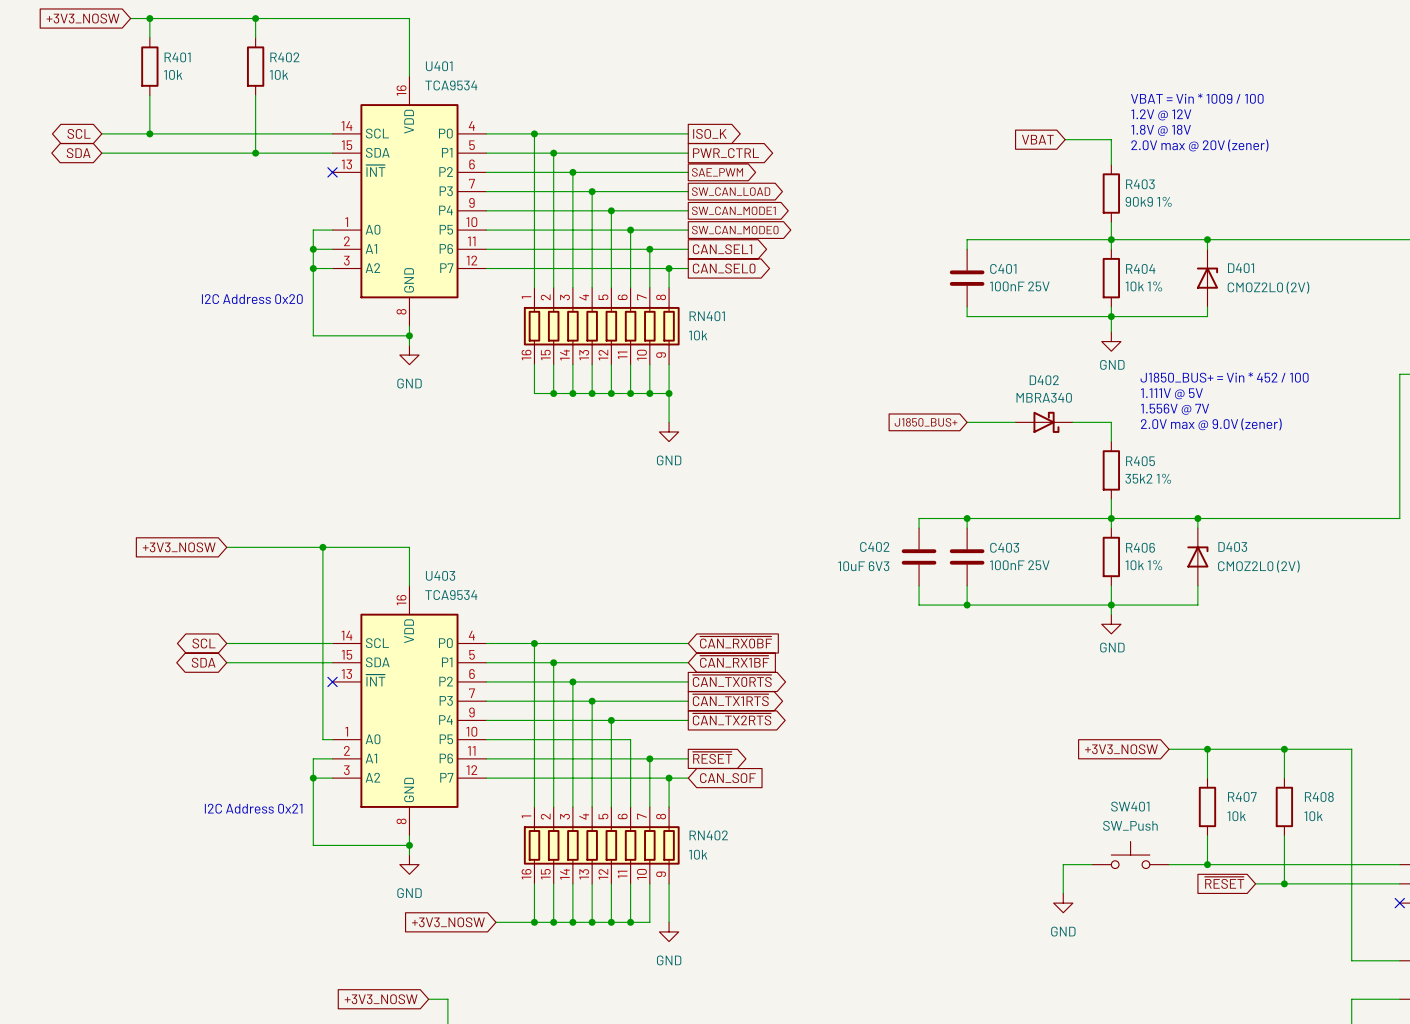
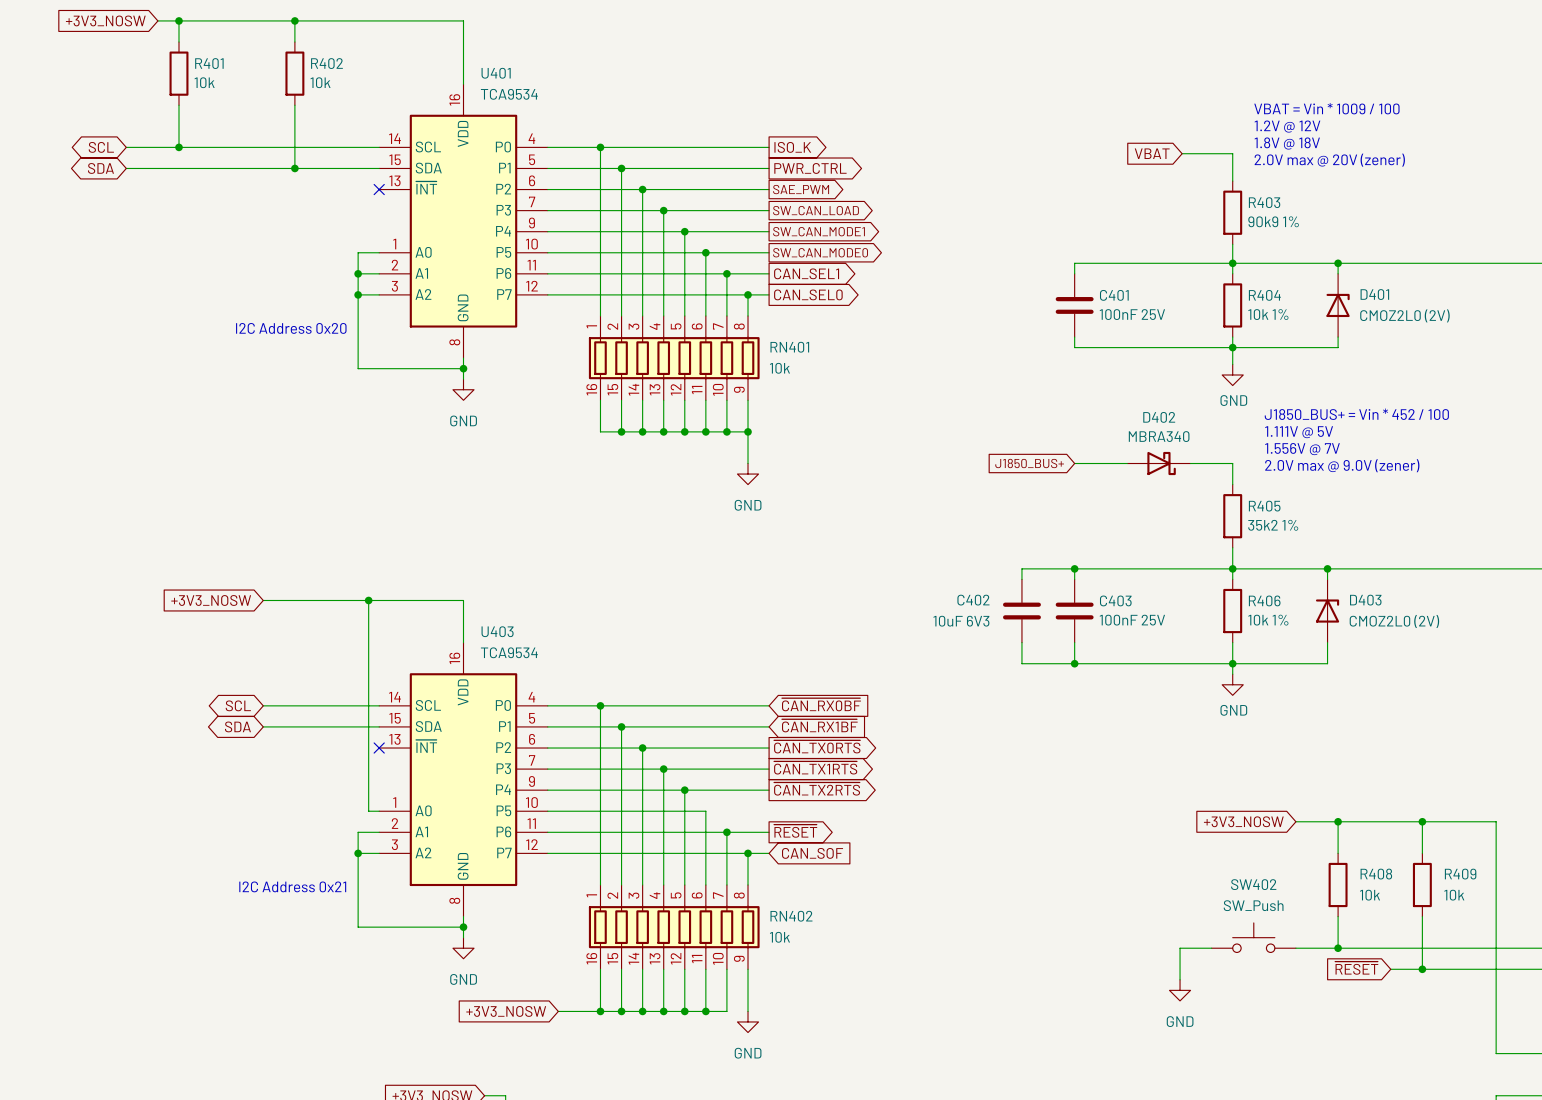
R407 name: R407 (1242, 796) -> R408 (1376, 874)
R408 name: R408 (1319, 796) -> R409 (1460, 874)
SW401 name: SW401 (1130, 806) -> SW402 (1253, 884)

